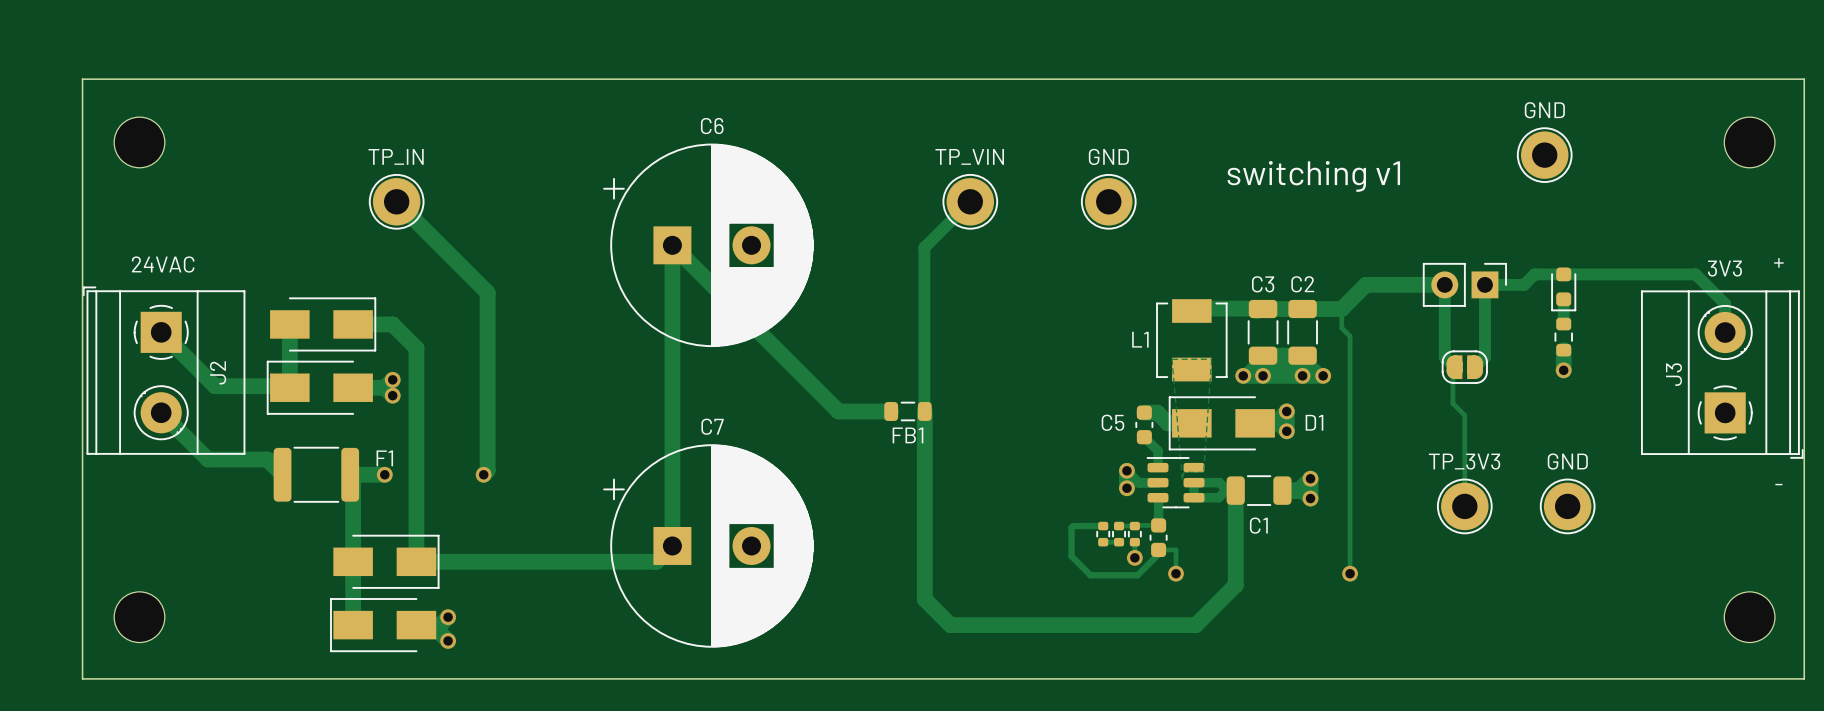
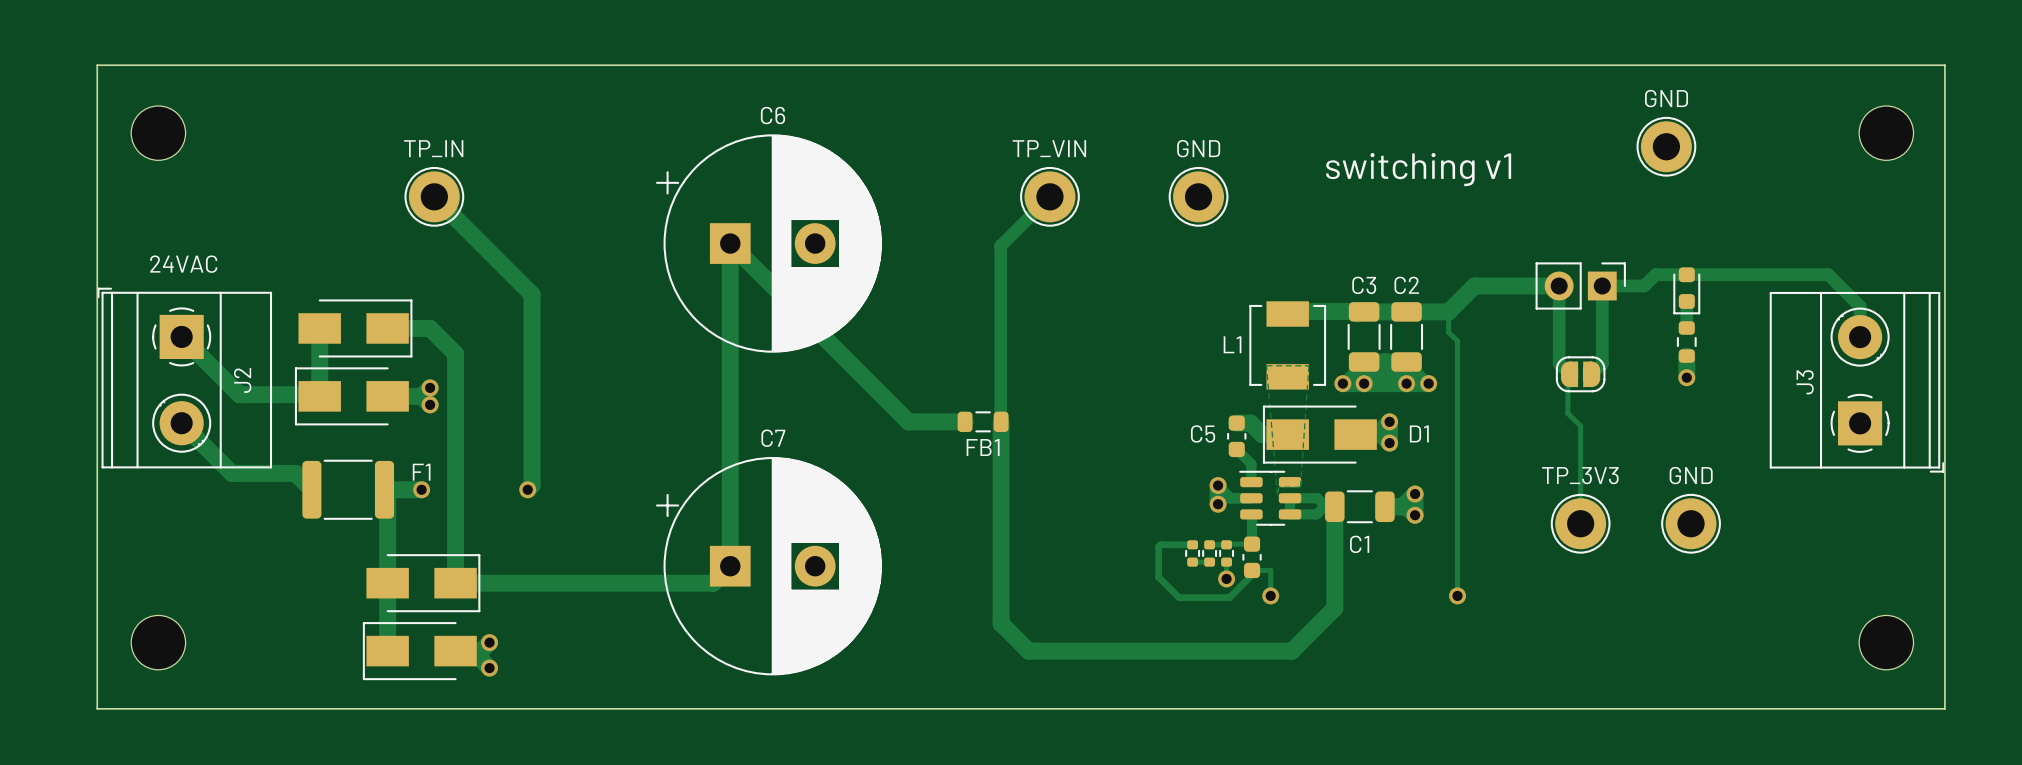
text: + (1778, 262) -> none
J3 value: 3V3 (1724, 268) -> none
text: - (1778, 484) -> none

